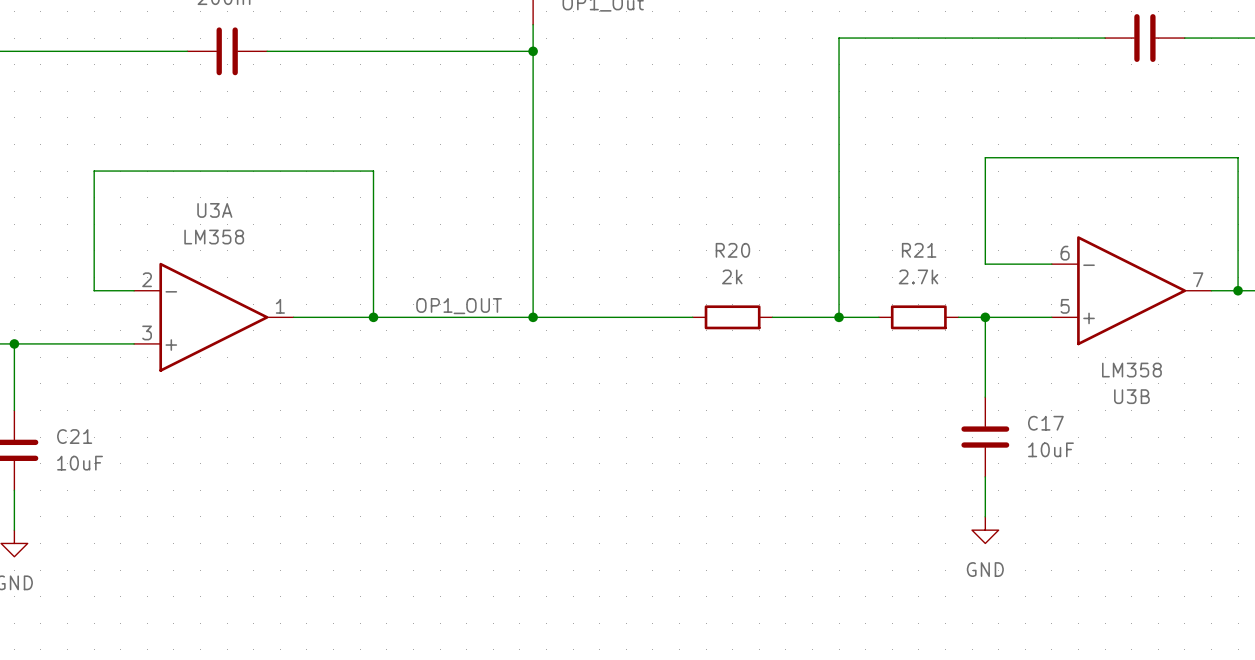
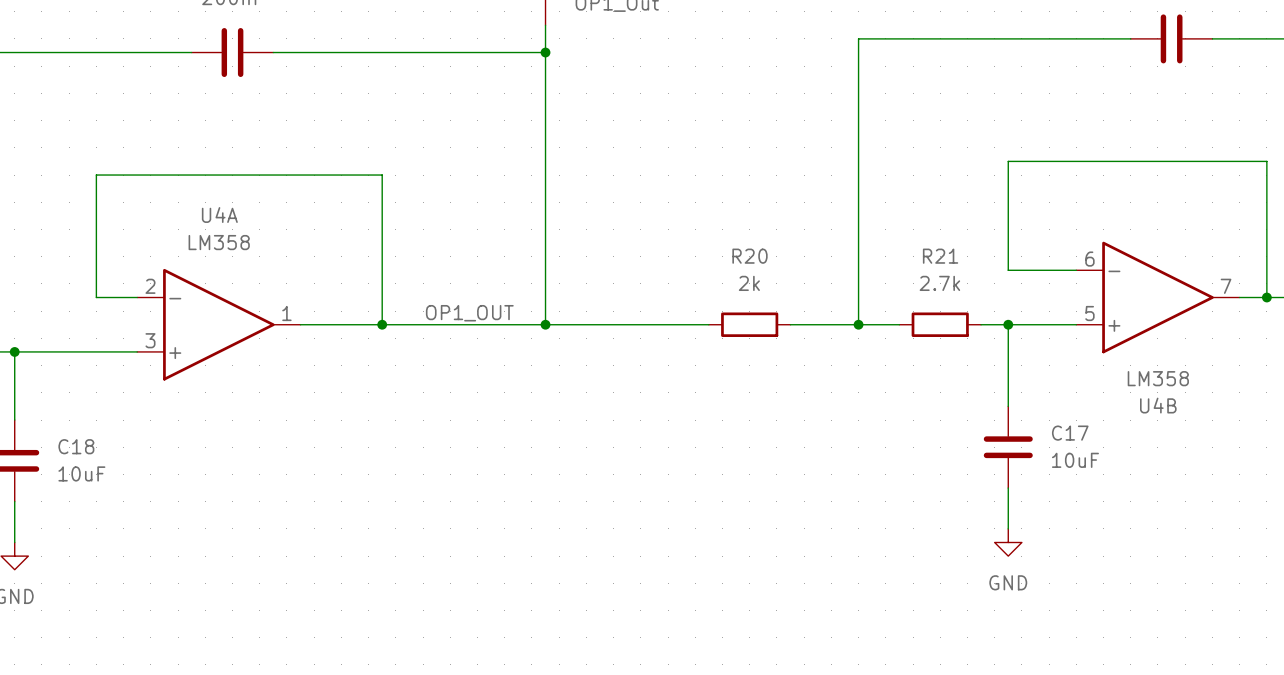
U3A name: U3A (214, 210) -> U4A (219, 215)
U3B name: U3B (1131, 396) -> U4B (1158, 405)
C21 name: C21 (74, 436) -> C18 (76, 446)

